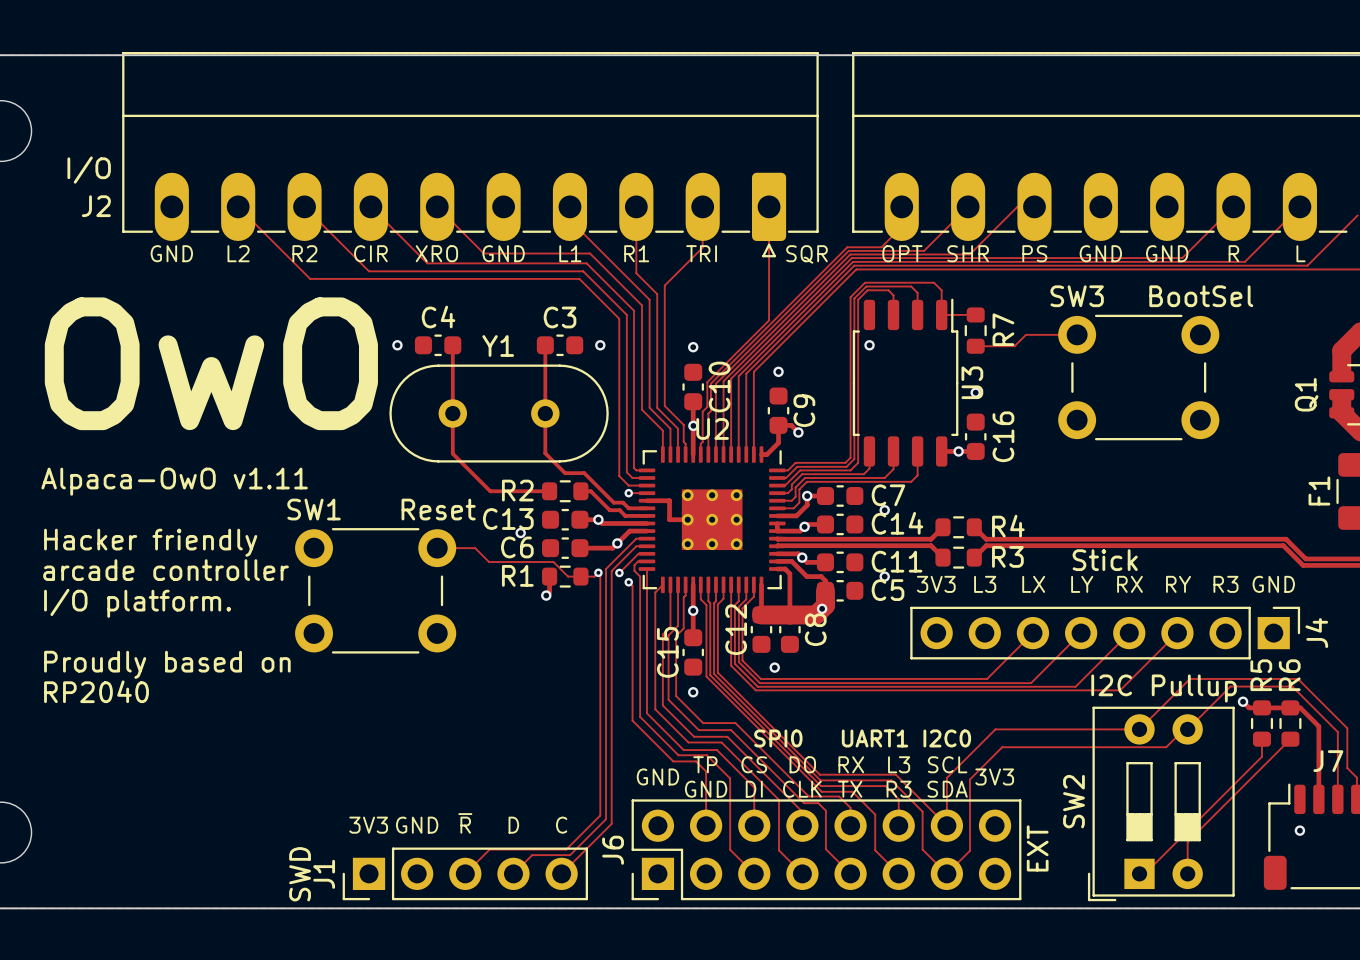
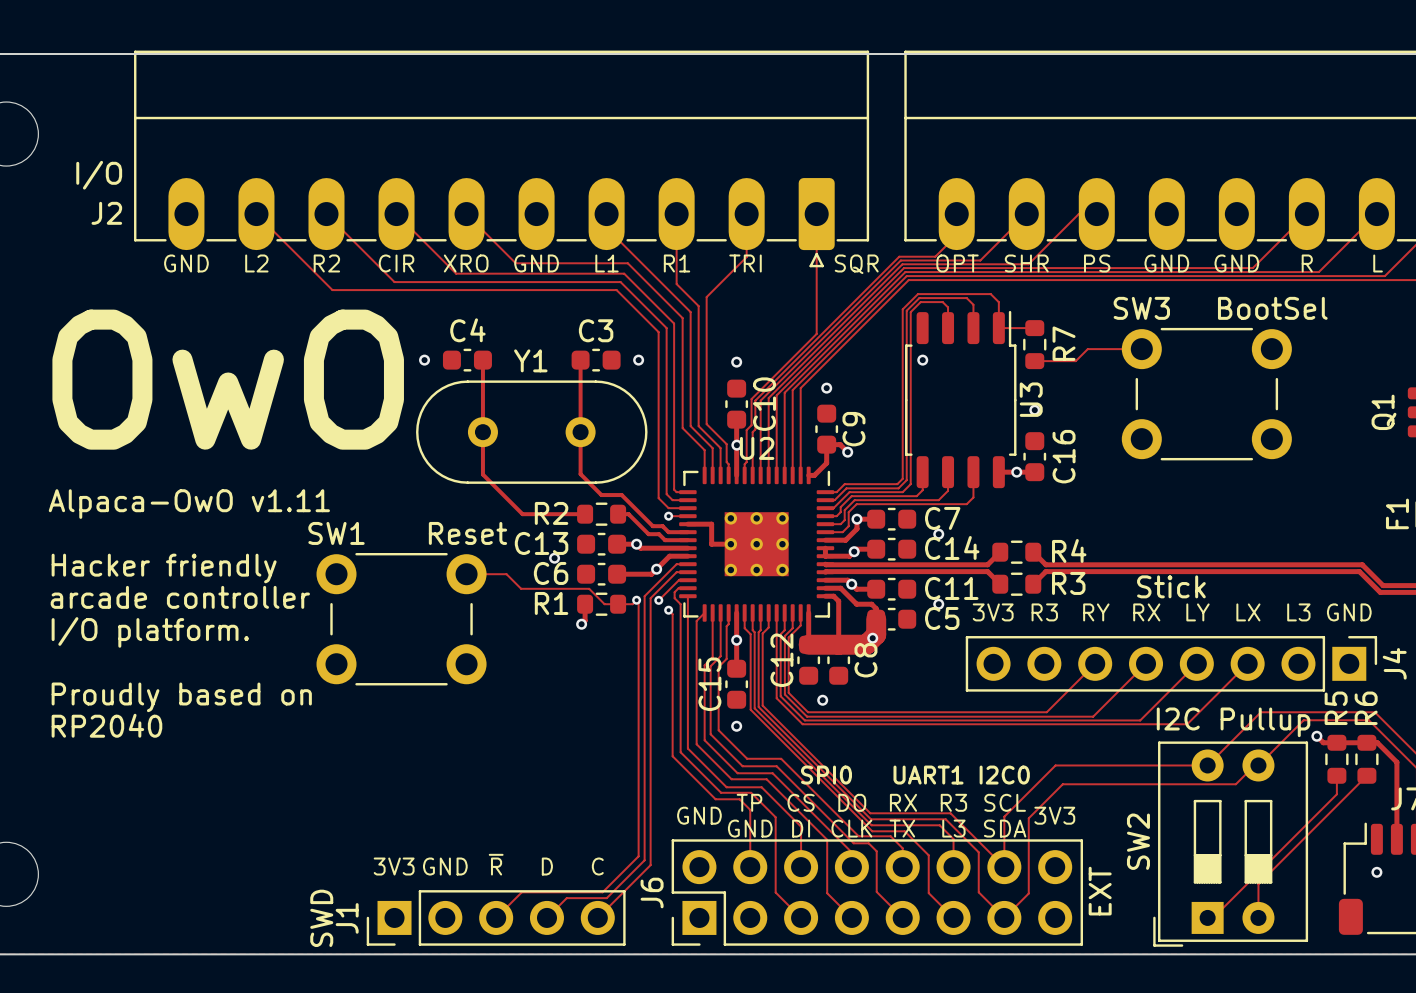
text: L3 (985, 584) -> R3 (1044, 612)
text: LX (1033, 584) -> RY (1096, 612)
text: LY (1082, 584) -> RX (1146, 612)
text: RX (1130, 584) -> LY (1197, 612)
text: RY (1178, 584) -> LX (1248, 612)
text: R3 (1225, 584) -> L3 (1298, 612)
text: L3 (899, 764) -> R3 (953, 802)
text: R3 (899, 789) -> L3 (953, 828)

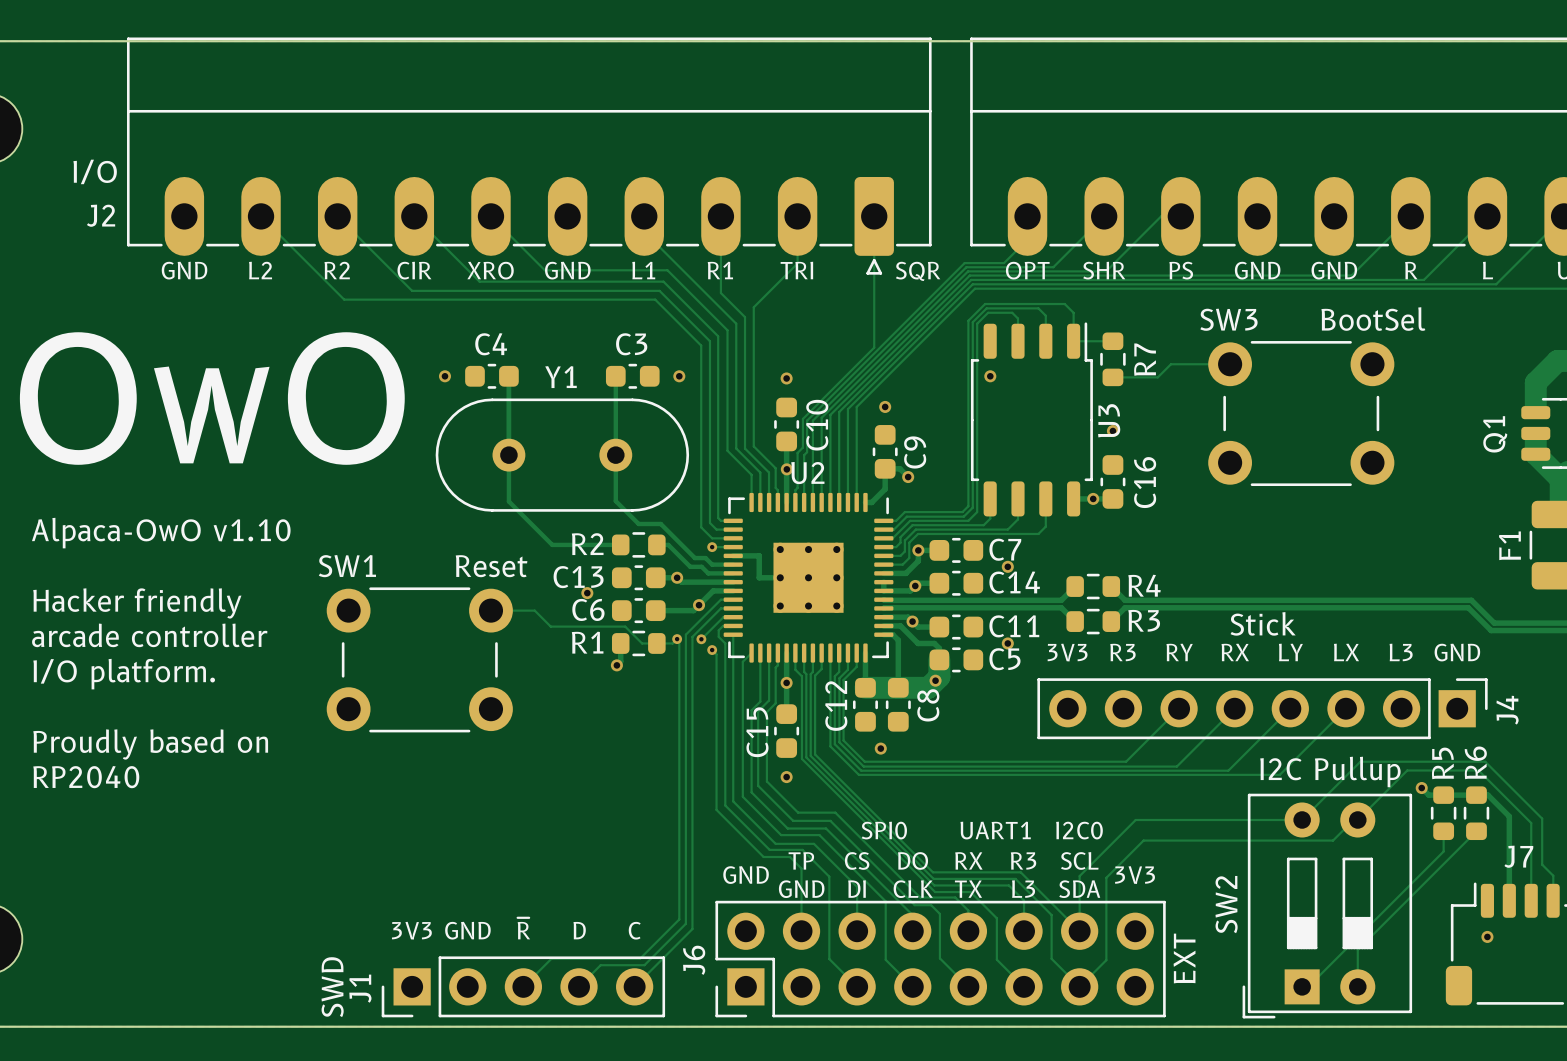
text: Alpaca-OwO v1.11 (189, 504) -> Alpaca-OwO v1.10 (161, 533)

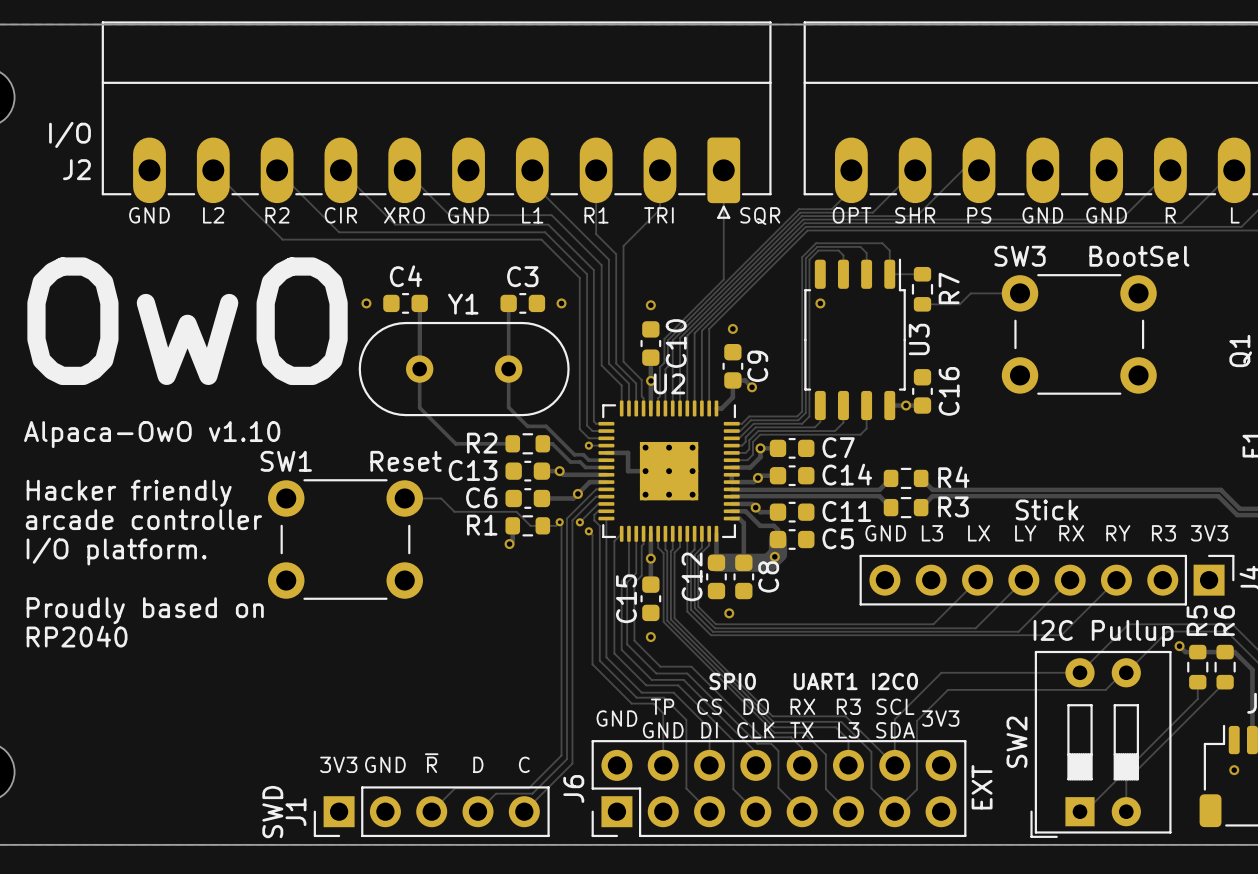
via: (1112, 431) -> none
via: (1007, 566) -> none
via: (587, 593) -> none
via: (1007, 643) -> none
text: 3V3 (1067, 652) -> GND (885, 533)
text: R3 (1122, 652) -> L3 (932, 533)
text: RY (1179, 652) -> LX (979, 533)
text: RX (1235, 652) -> LY (1025, 533)
text: LY (1290, 652) -> RX (1071, 533)
text: LX (1346, 652) -> RY (1118, 533)
text: L3 (1401, 652) -> R3 (1163, 533)
text: GND (1457, 652) -> 3V3 (1209, 533)

